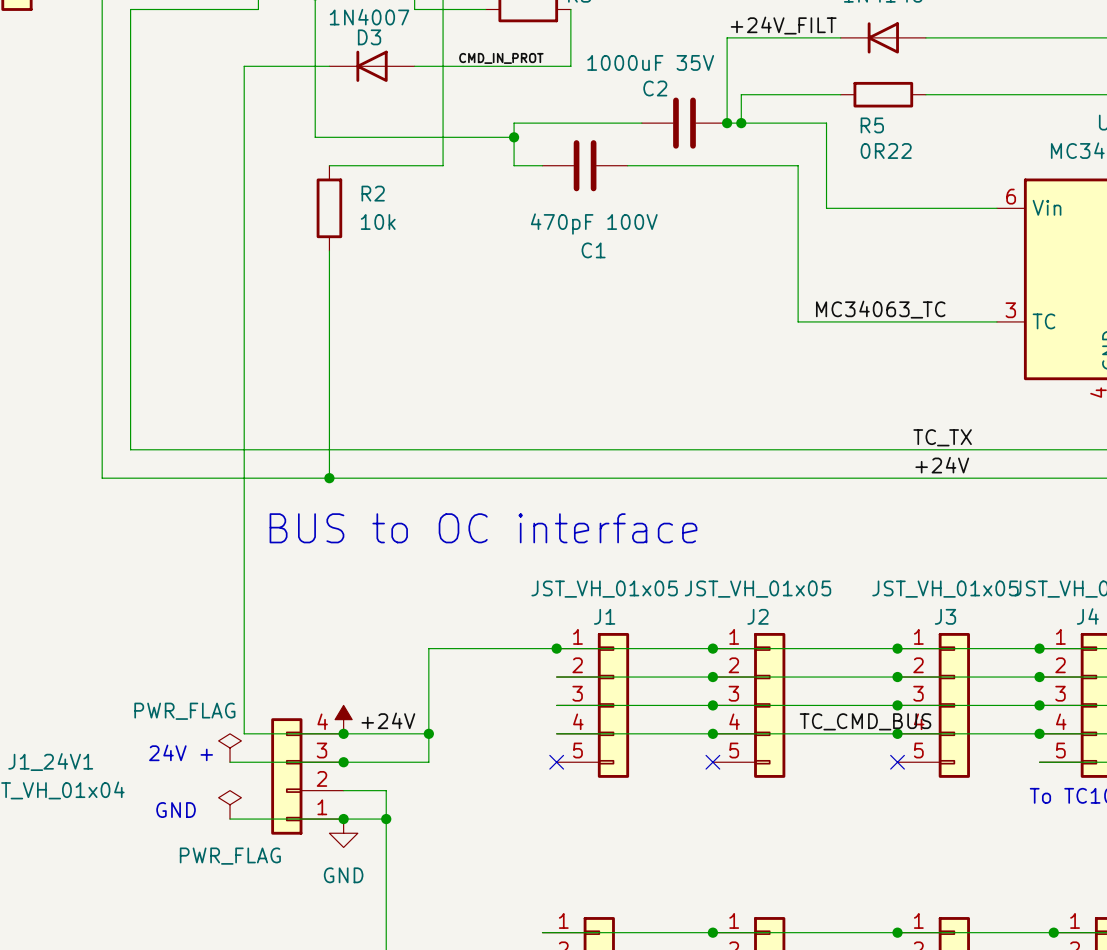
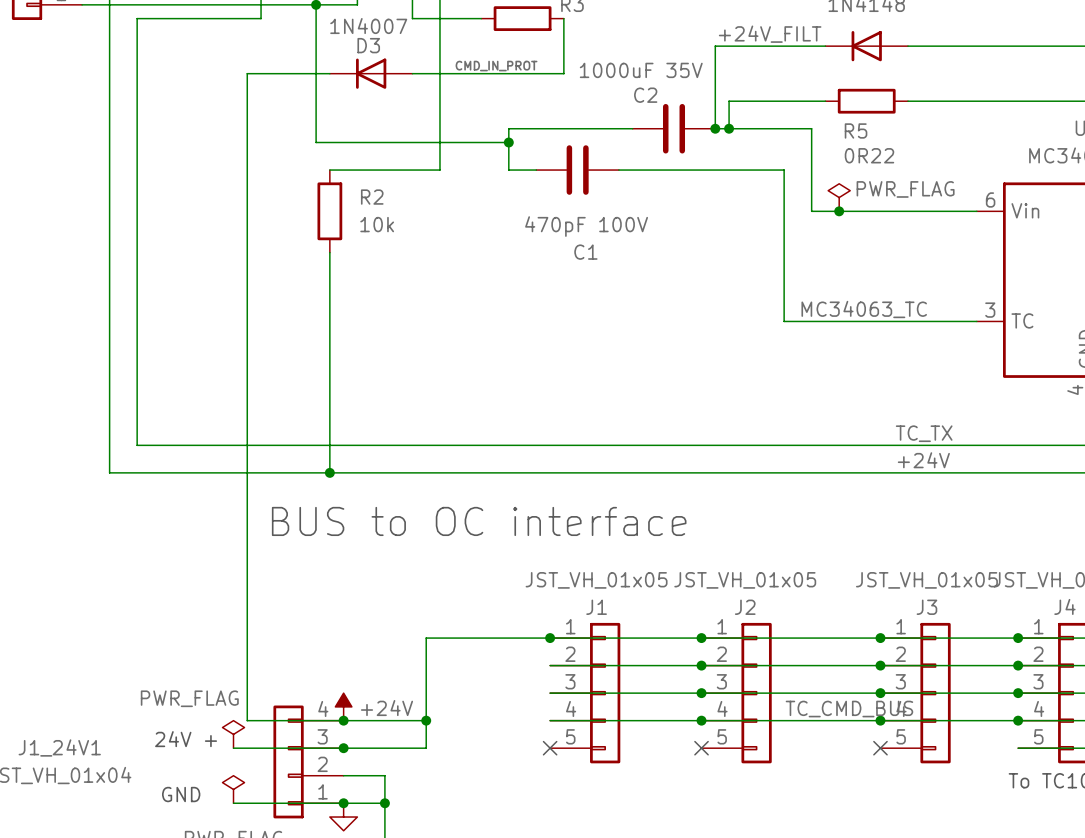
power symbol: none -> PWR_FLAG (839, 197)
junction: none -> (839, 211)

